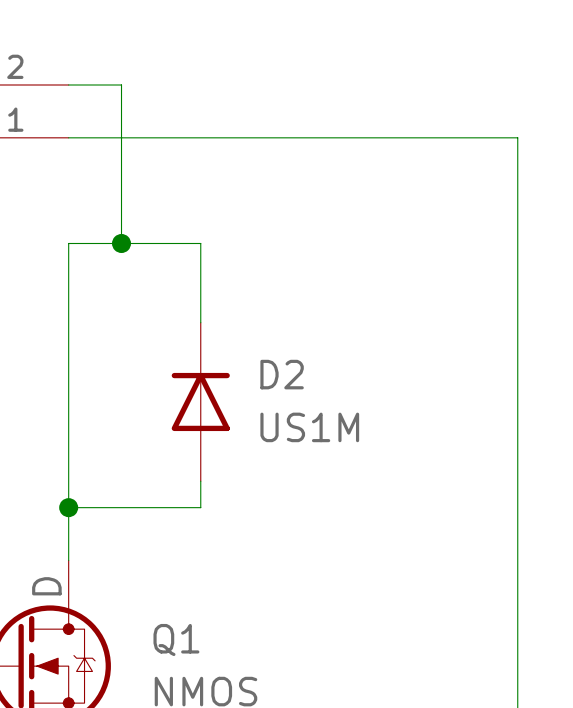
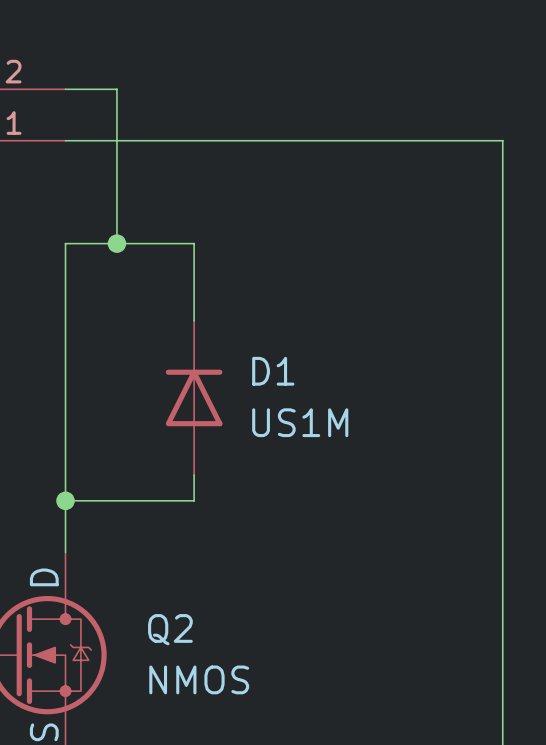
D2 name: D2 (282, 374) -> D1 (273, 371)
Q1 name: Q1 (176, 640) -> Q2 (170, 629)

